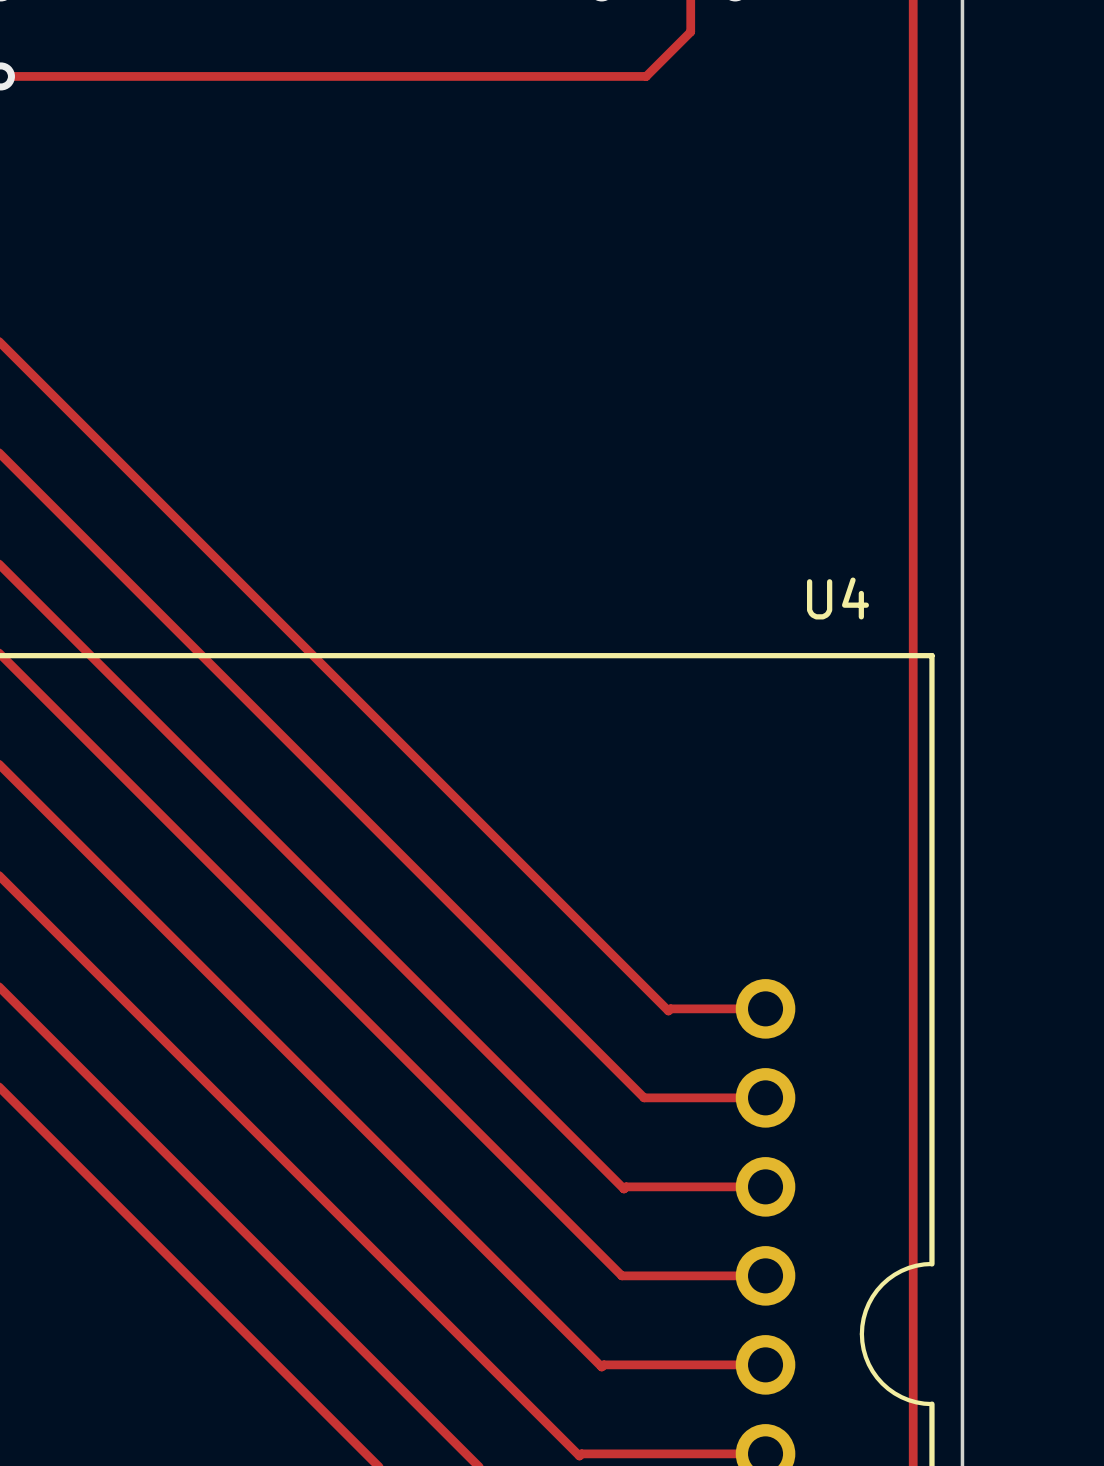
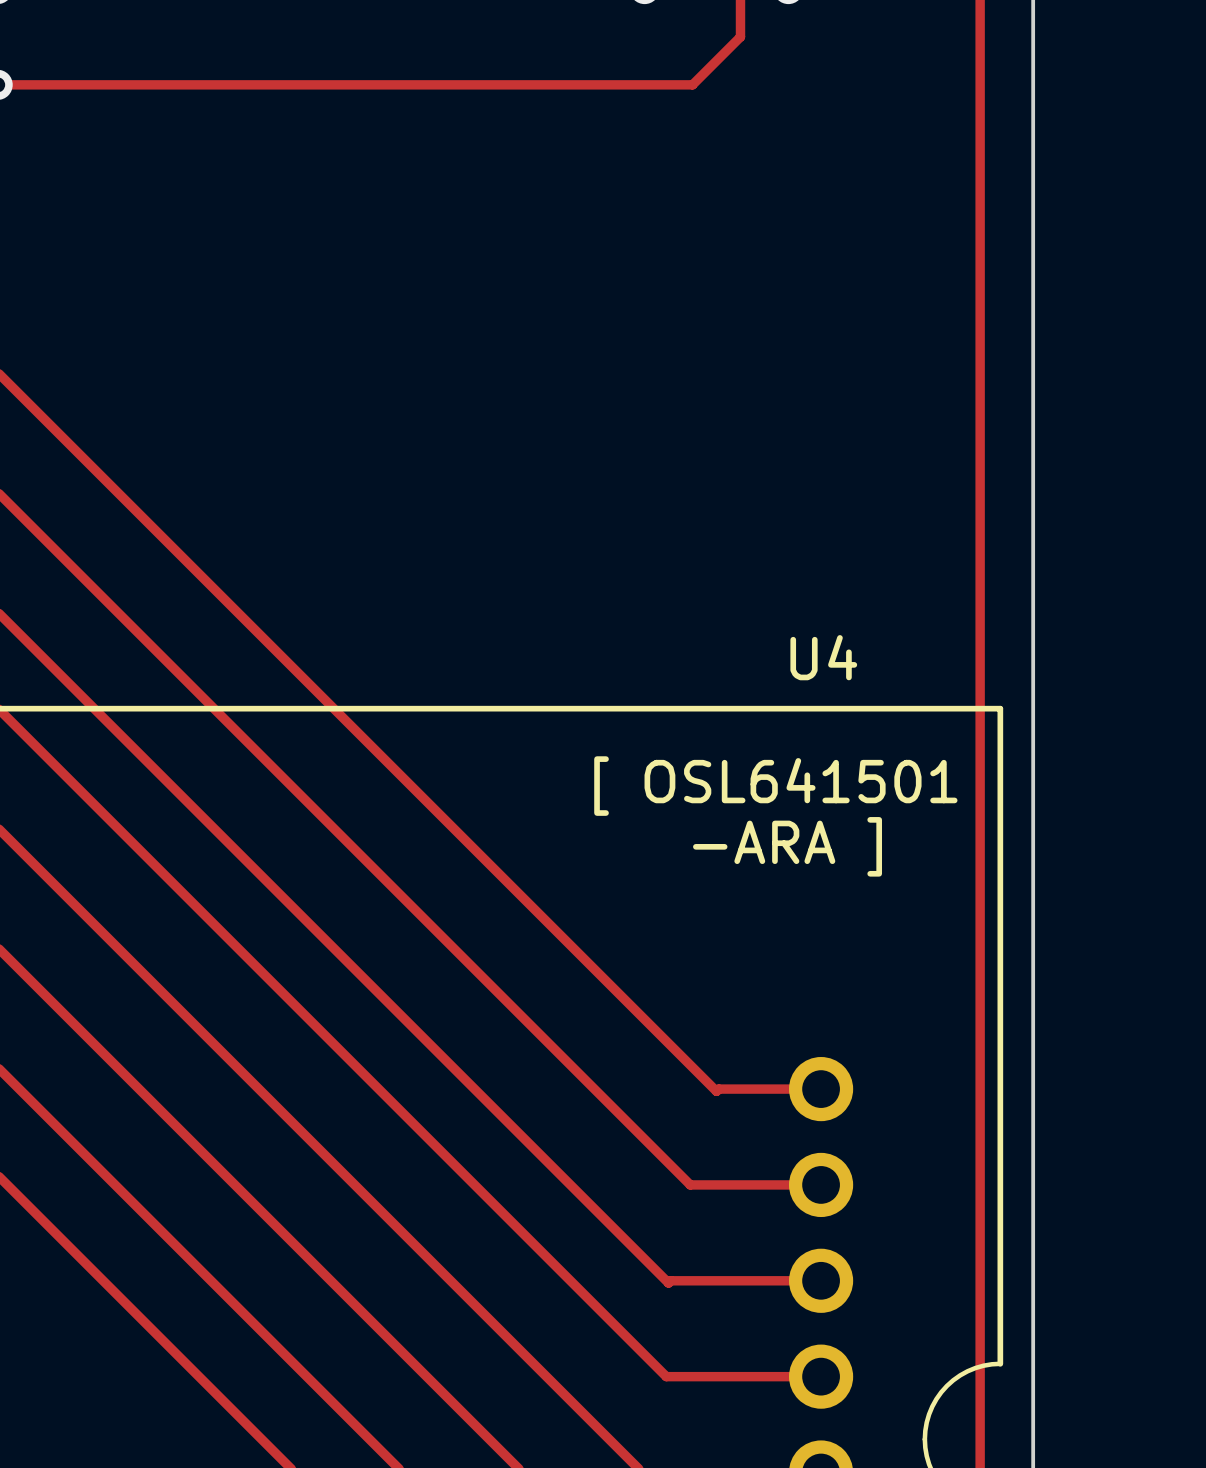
U4 name position: U4 (837, 598) -> U4 (823, 657)
text: none -> [ OSL641501 (775, 786)
text: none -> -ARA ] (787, 846)

